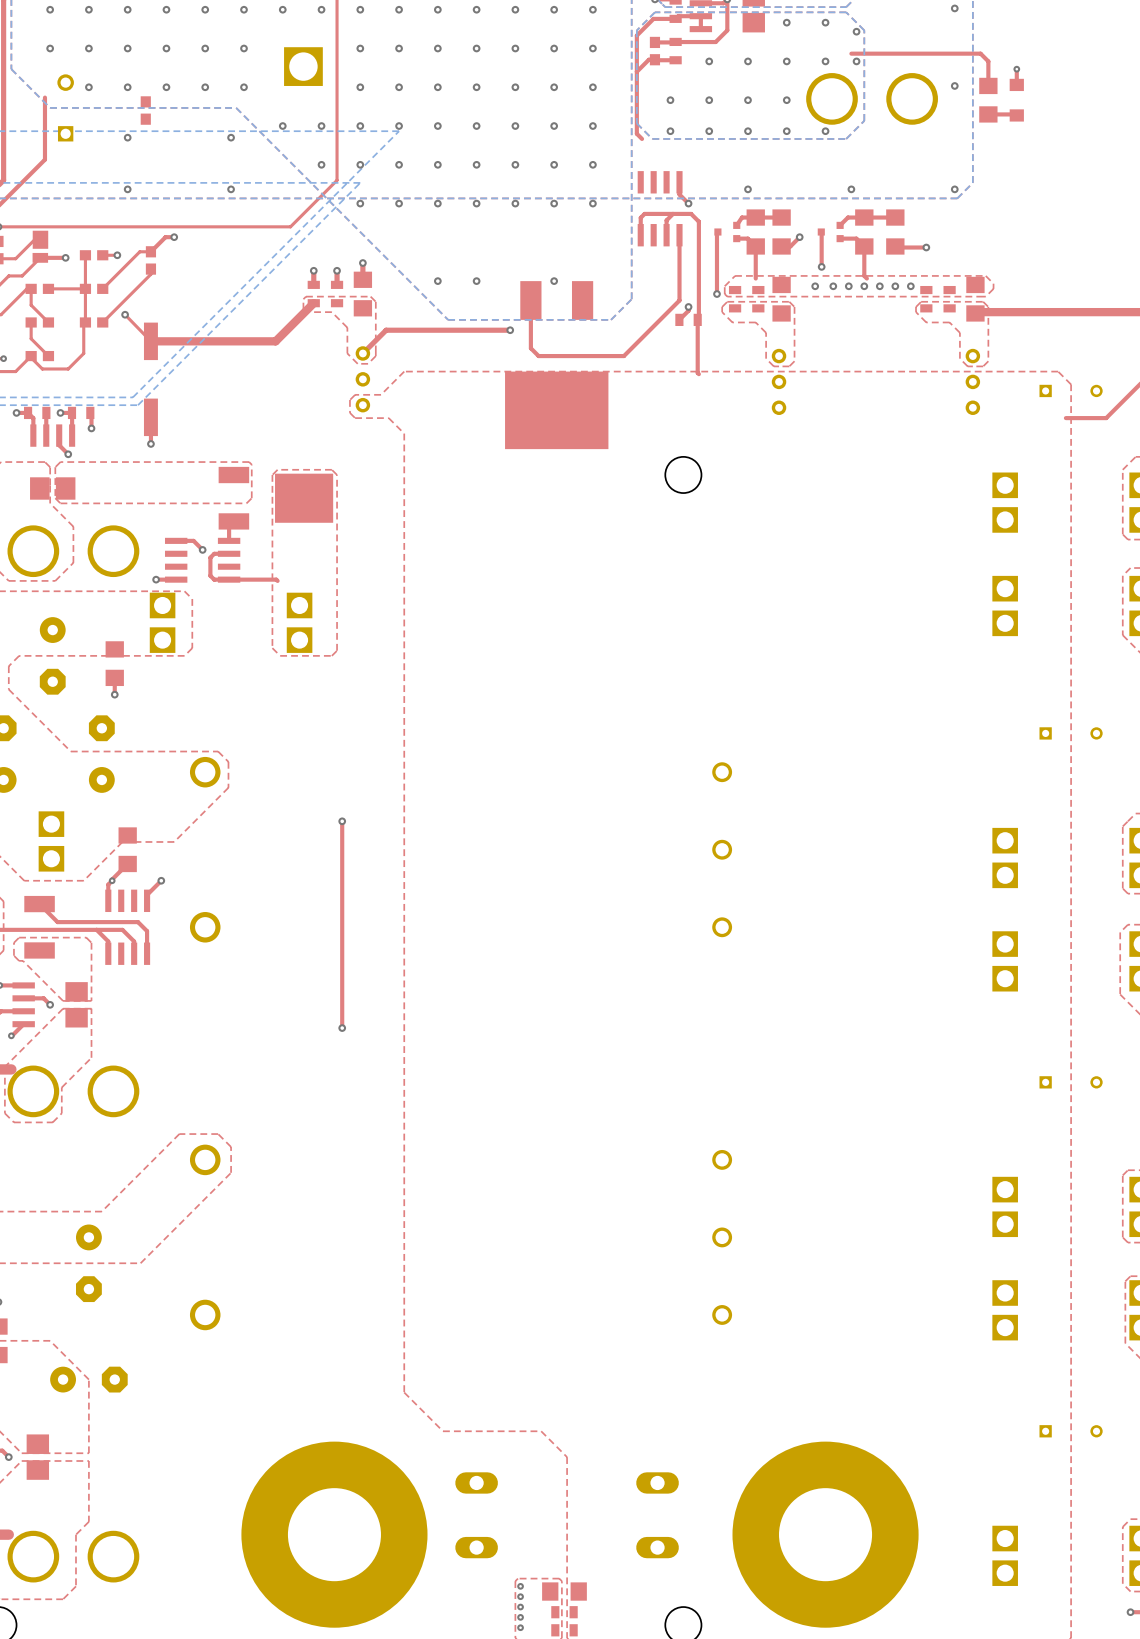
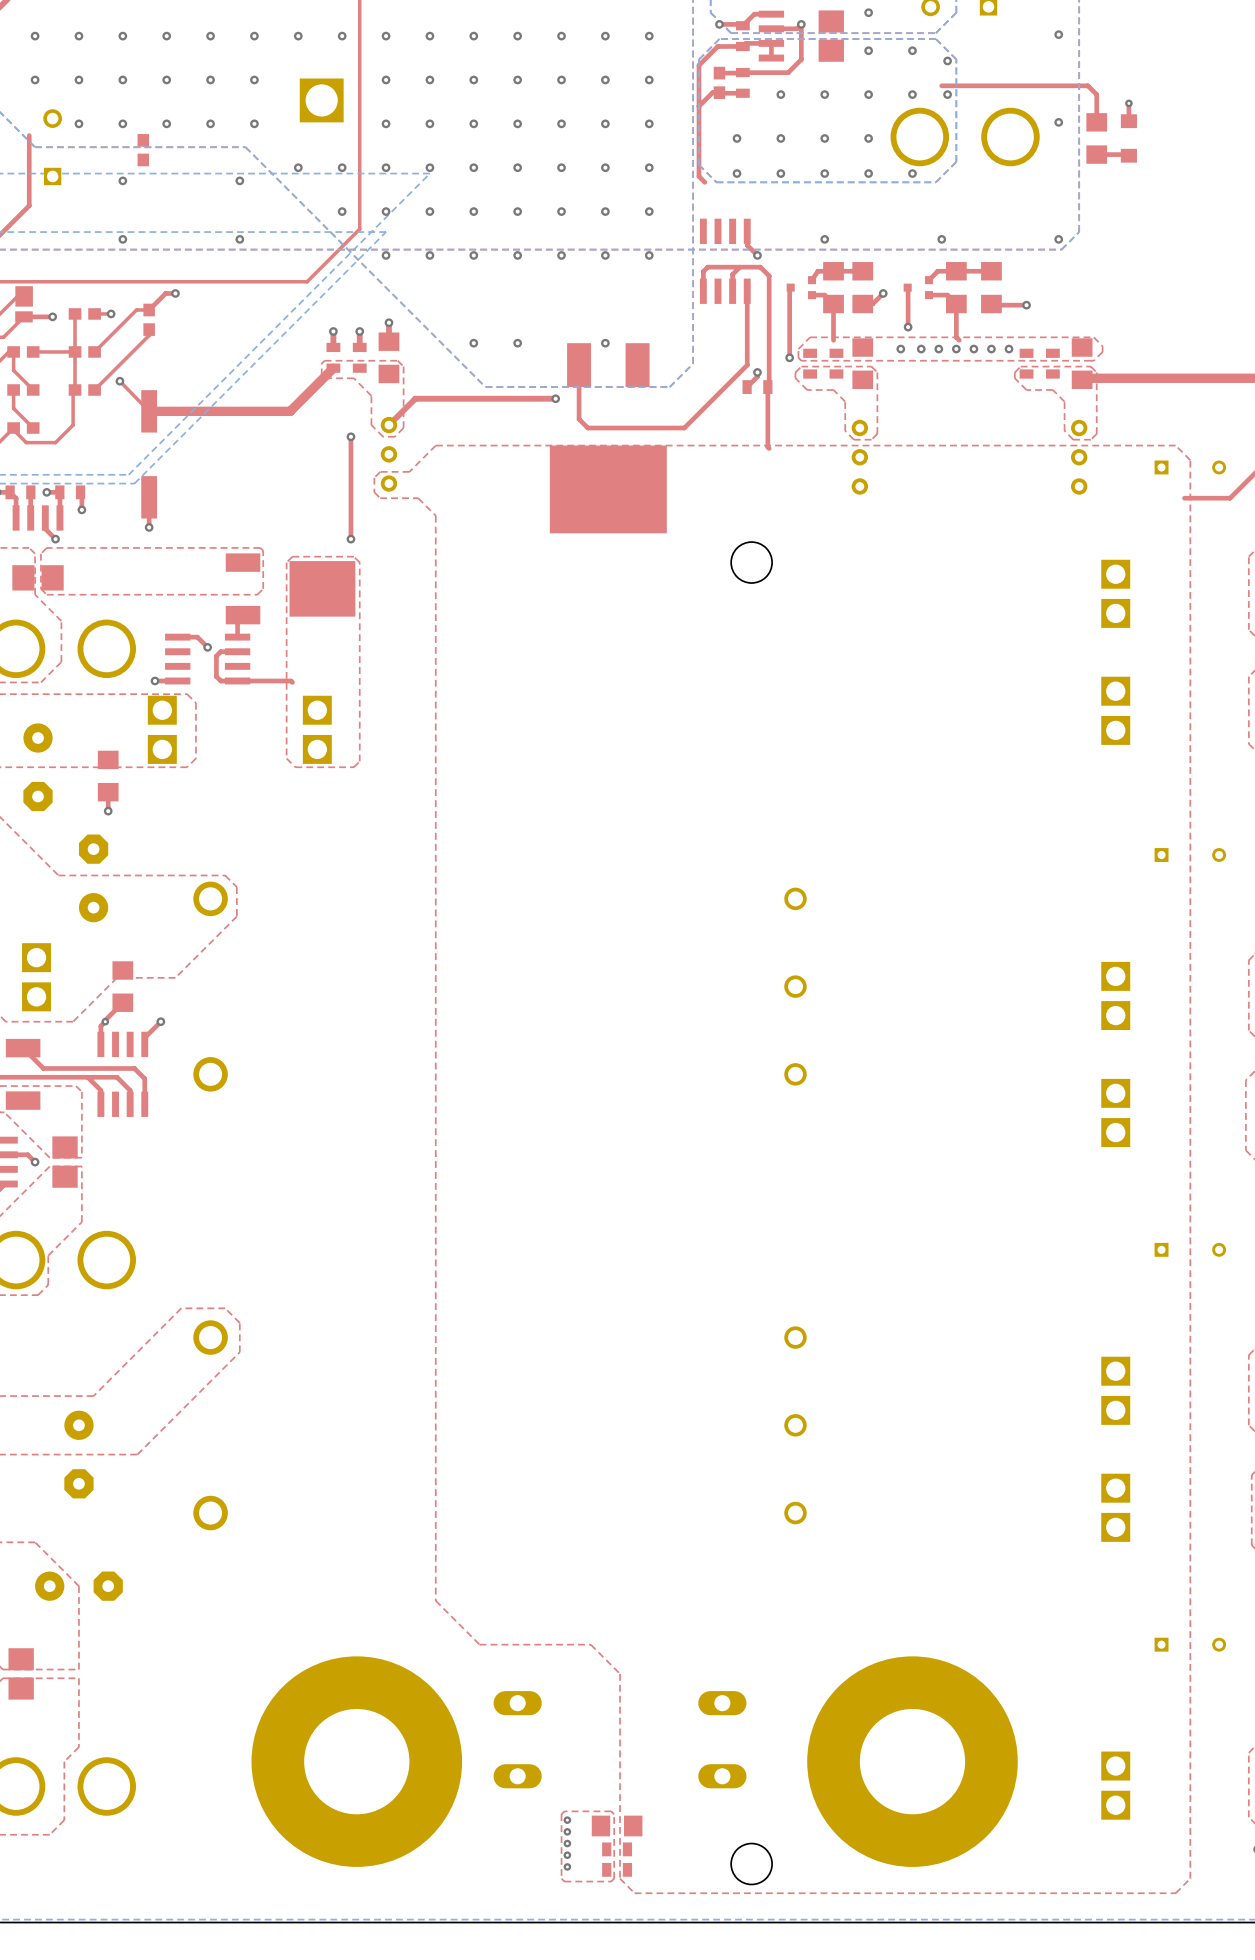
top track: none -> (350, 436) (350, 539)
via: none -> (350, 436)
via: none -> (350, 539)
top track: (342, 821) (342, 1028) -> none
via: (342, 821) -> none
via: (342, 1028) -> none

